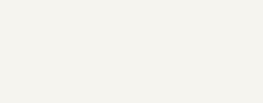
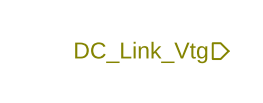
hierarchical label: none -> DC_Link_Vtg (141, 52)

